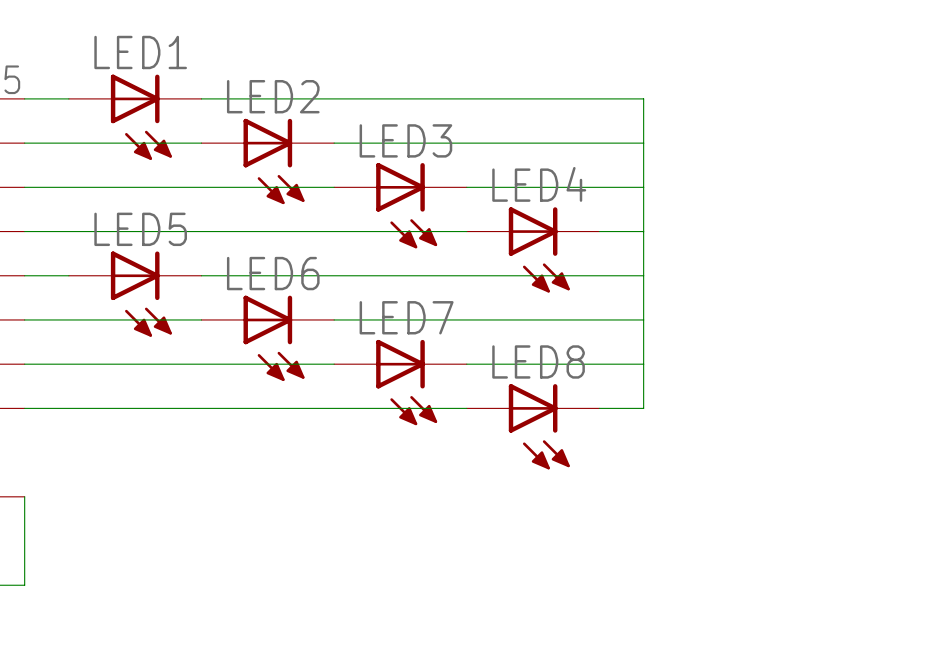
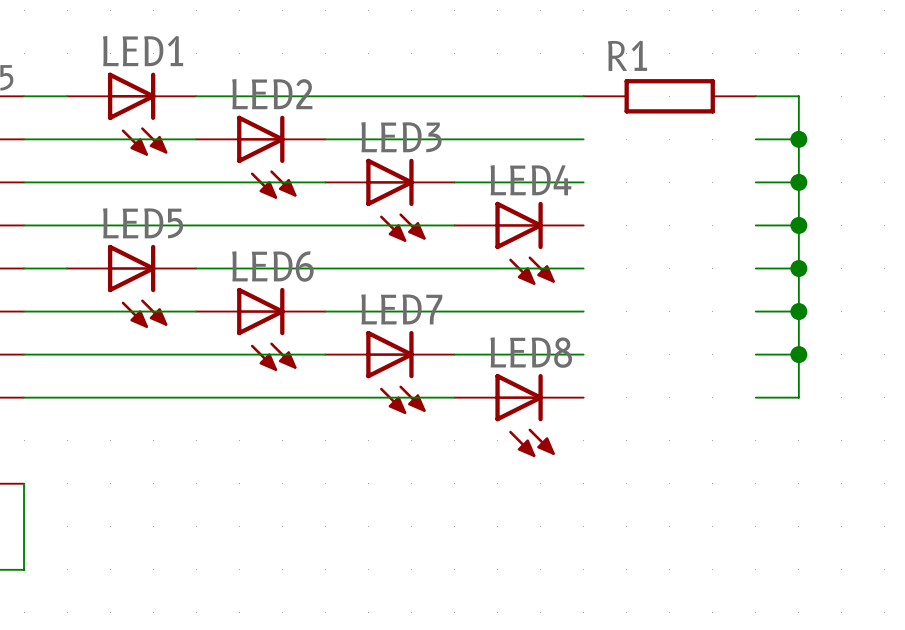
wire: (599, 98) (643, 98) (643, 408) (599, 408) -> (755, 96) (798, 96) (798, 397) (755, 397)
R1: none -> (669, 96)
wire: (599, 143) (643, 143) -> (755, 139) (798, 139)
junction: none -> (798, 139)
wire: (599, 187) (643, 187) -> (755, 182) (798, 182)
junction: none -> (798, 182)
wire: (599, 231) (643, 231) -> (755, 225) (798, 225)
junction: none -> (798, 225)
wire: (599, 275) (643, 275) -> (755, 268) (798, 268)
junction: none -> (798, 268)
wire: (599, 319) (643, 319) -> (755, 311) (798, 311)
junction: none -> (798, 311)
wire: (599, 364) (643, 364) -> (755, 354) (798, 354)
junction: none -> (798, 354)

